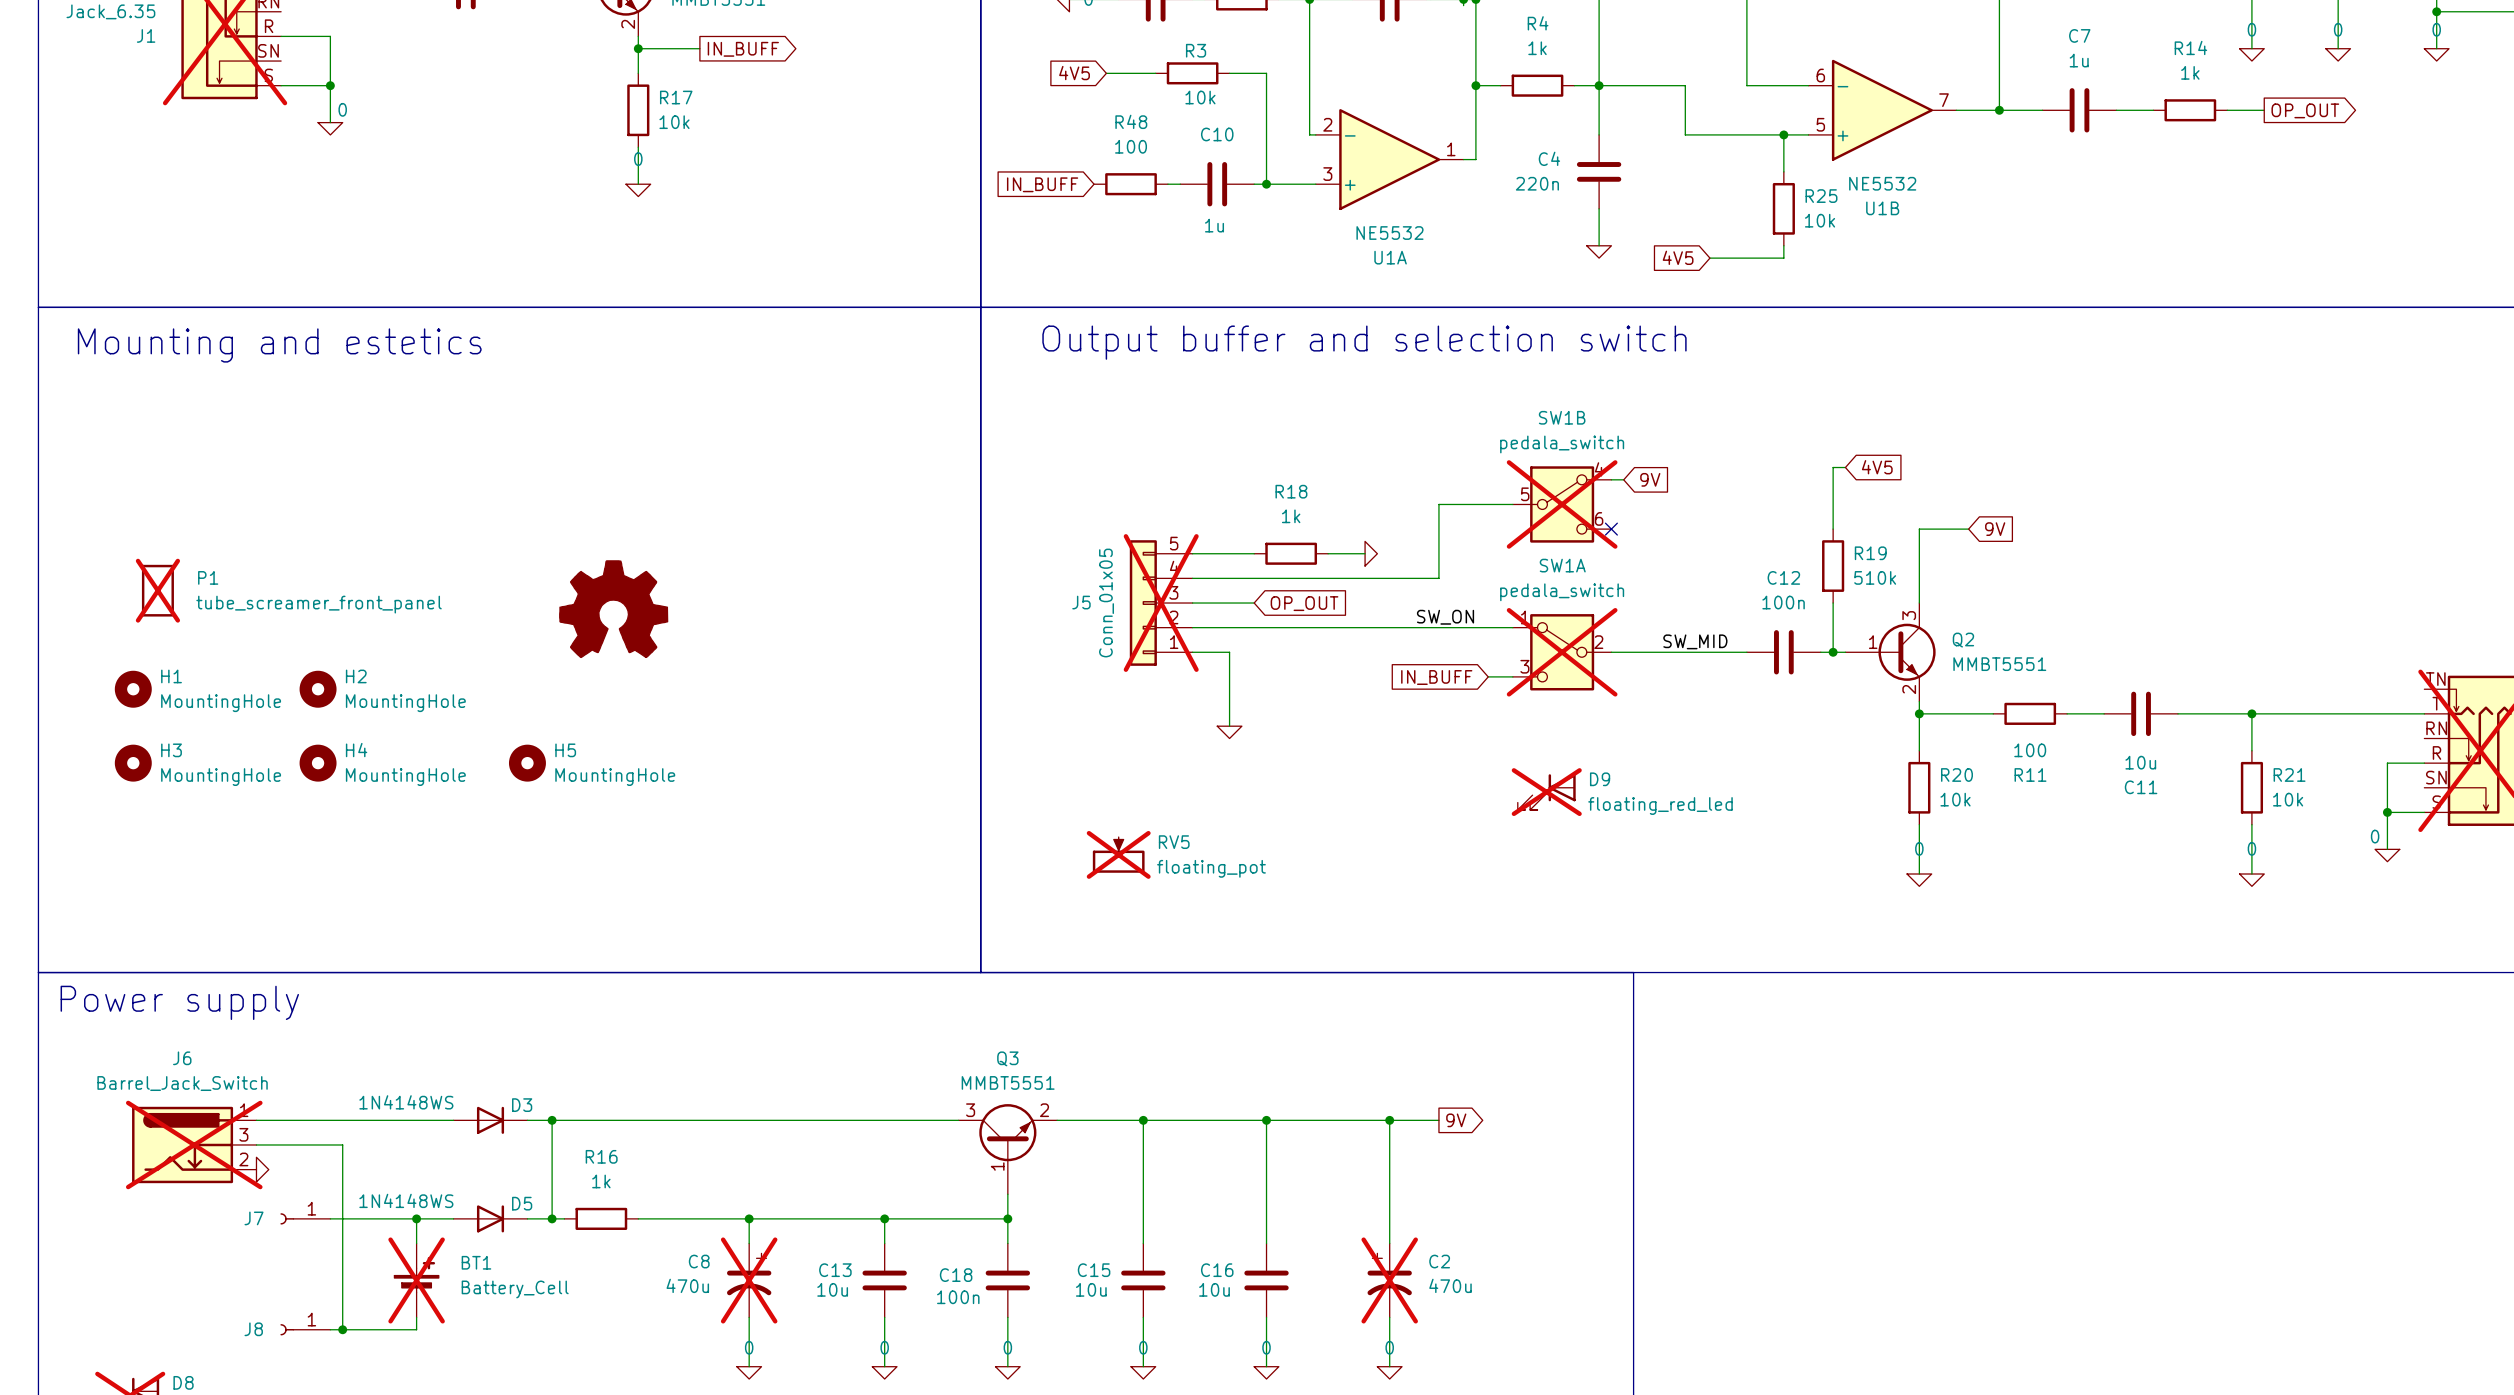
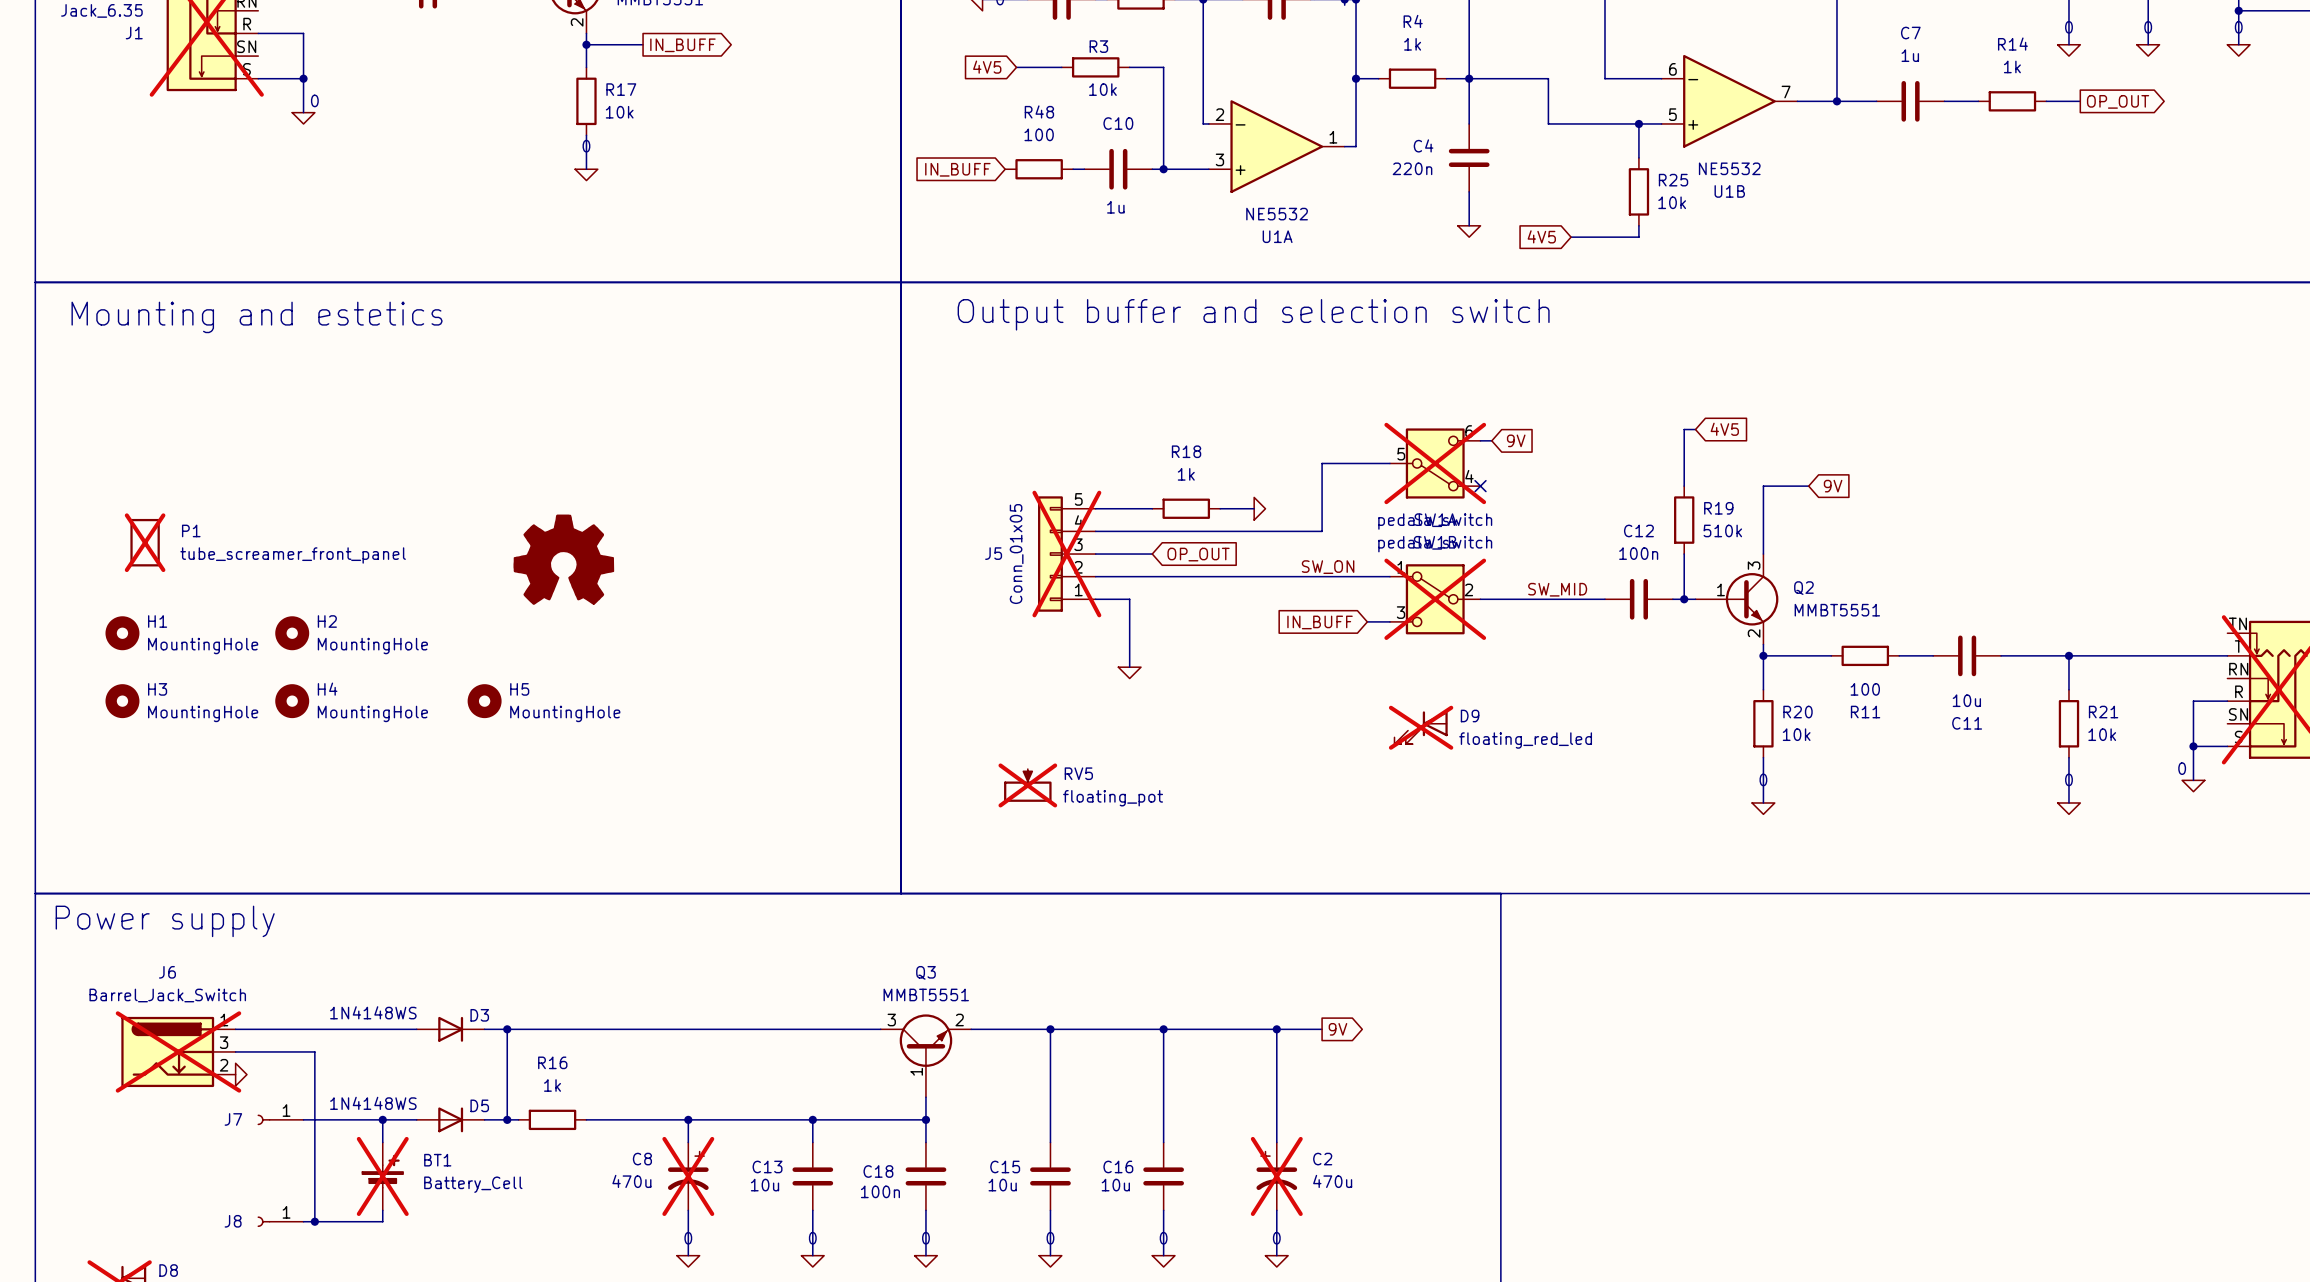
SW1B flip: as is (1562, 504) -> up-down (1435, 463)

